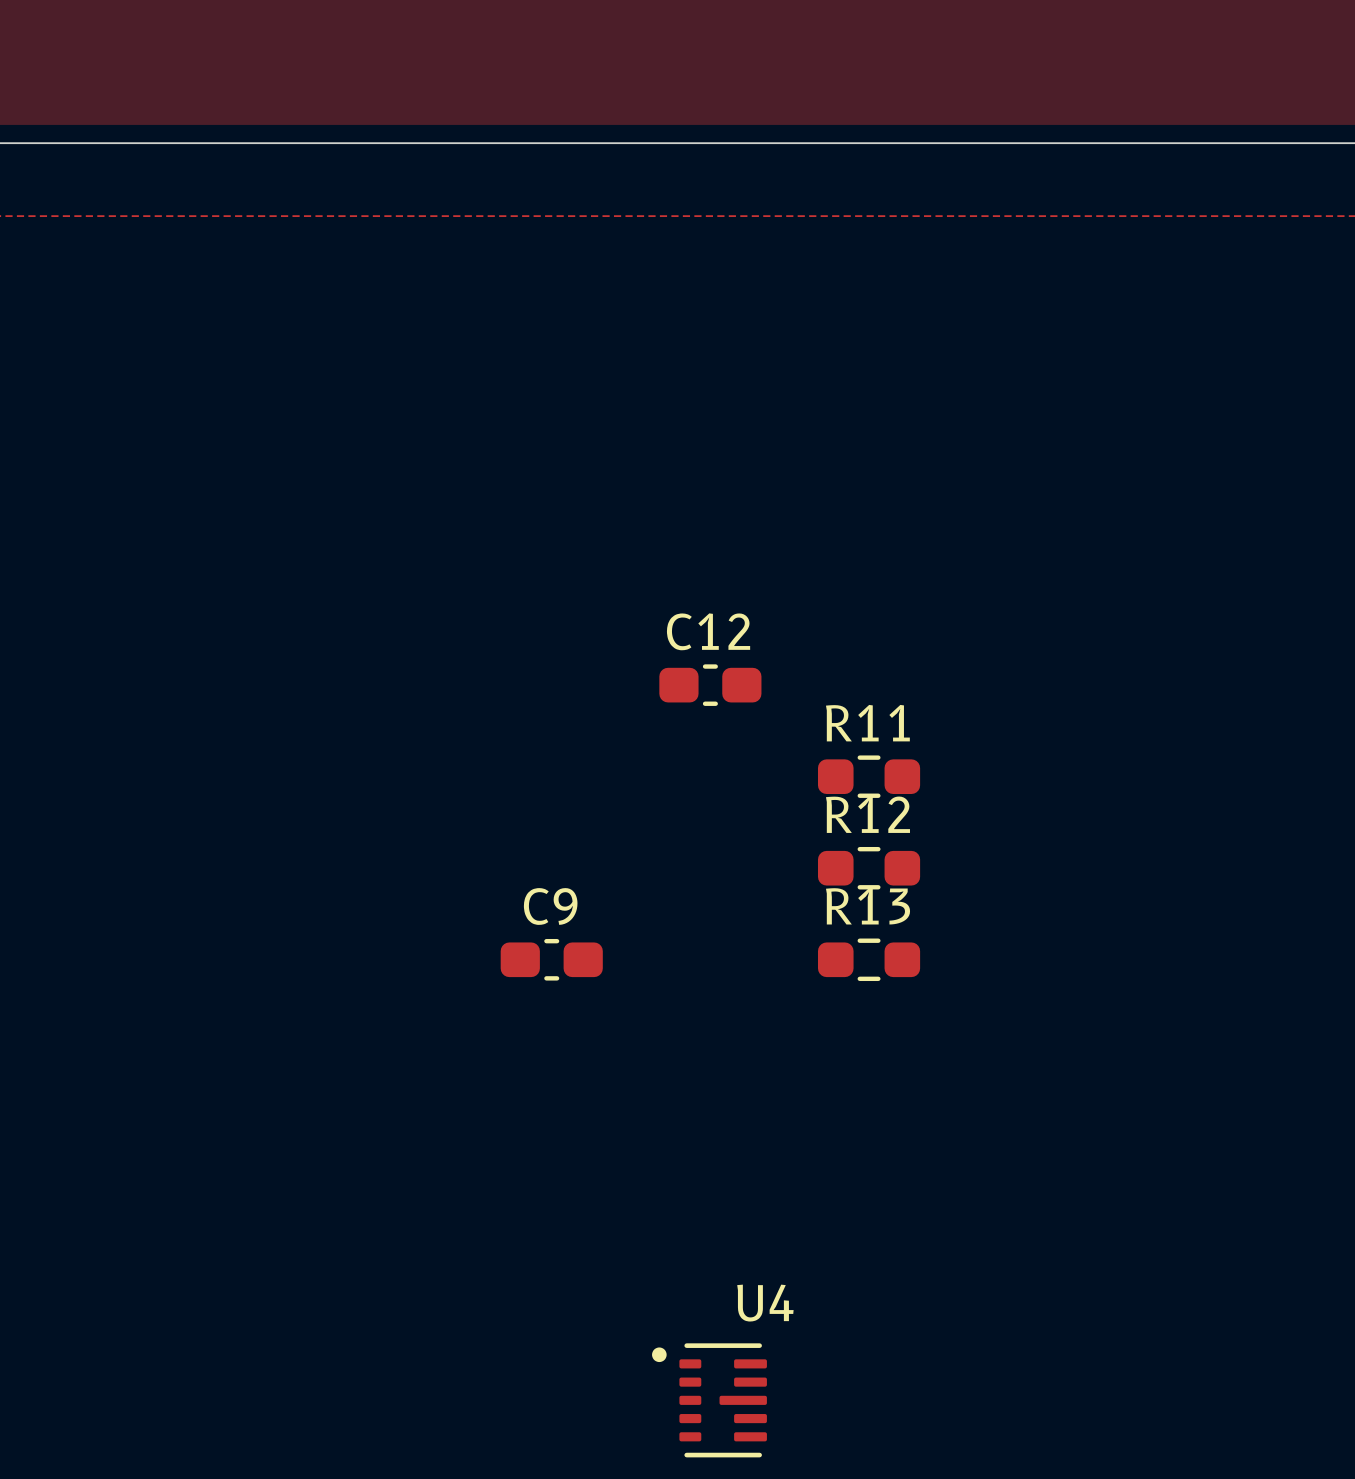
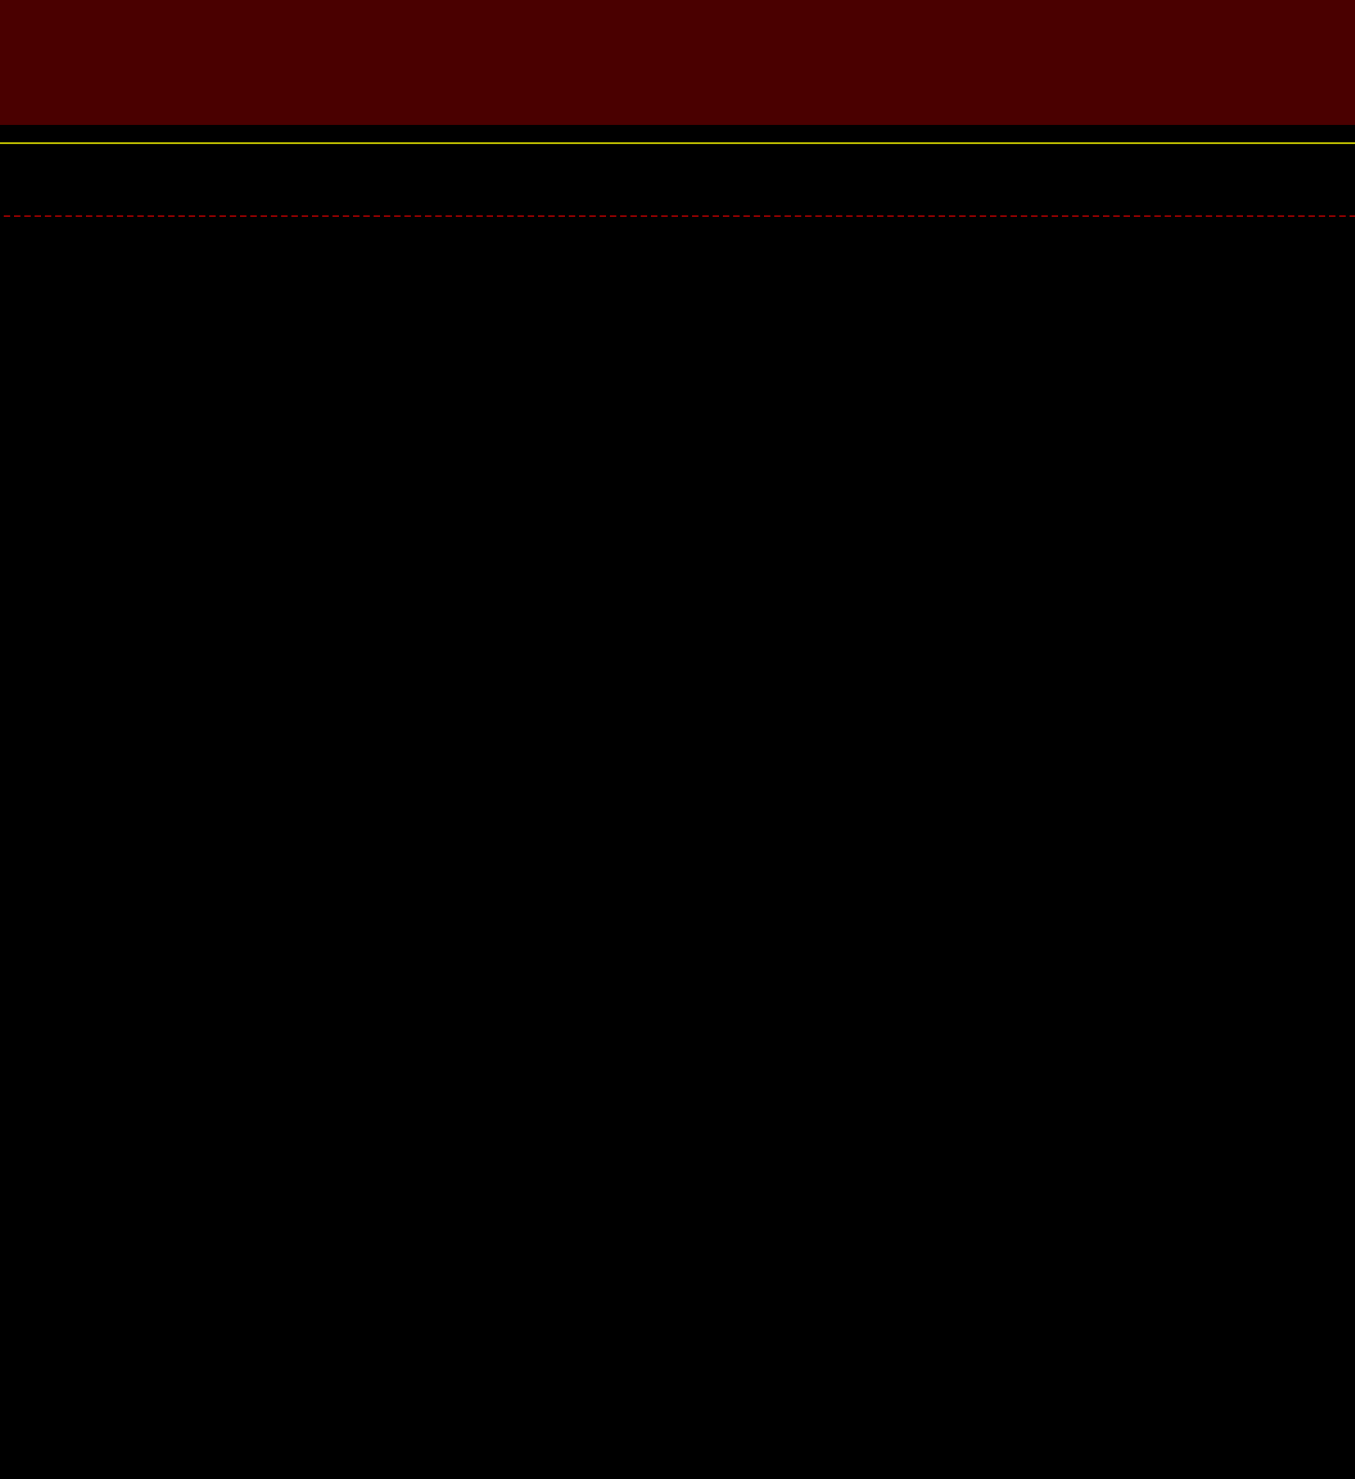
C12: (710, 685) -> none
R11: (869, 776) -> none
R12: (869, 868) -> none
C9: (551, 959) -> none
R13: (869, 959) -> none
U4: (709, 1400) -> none

